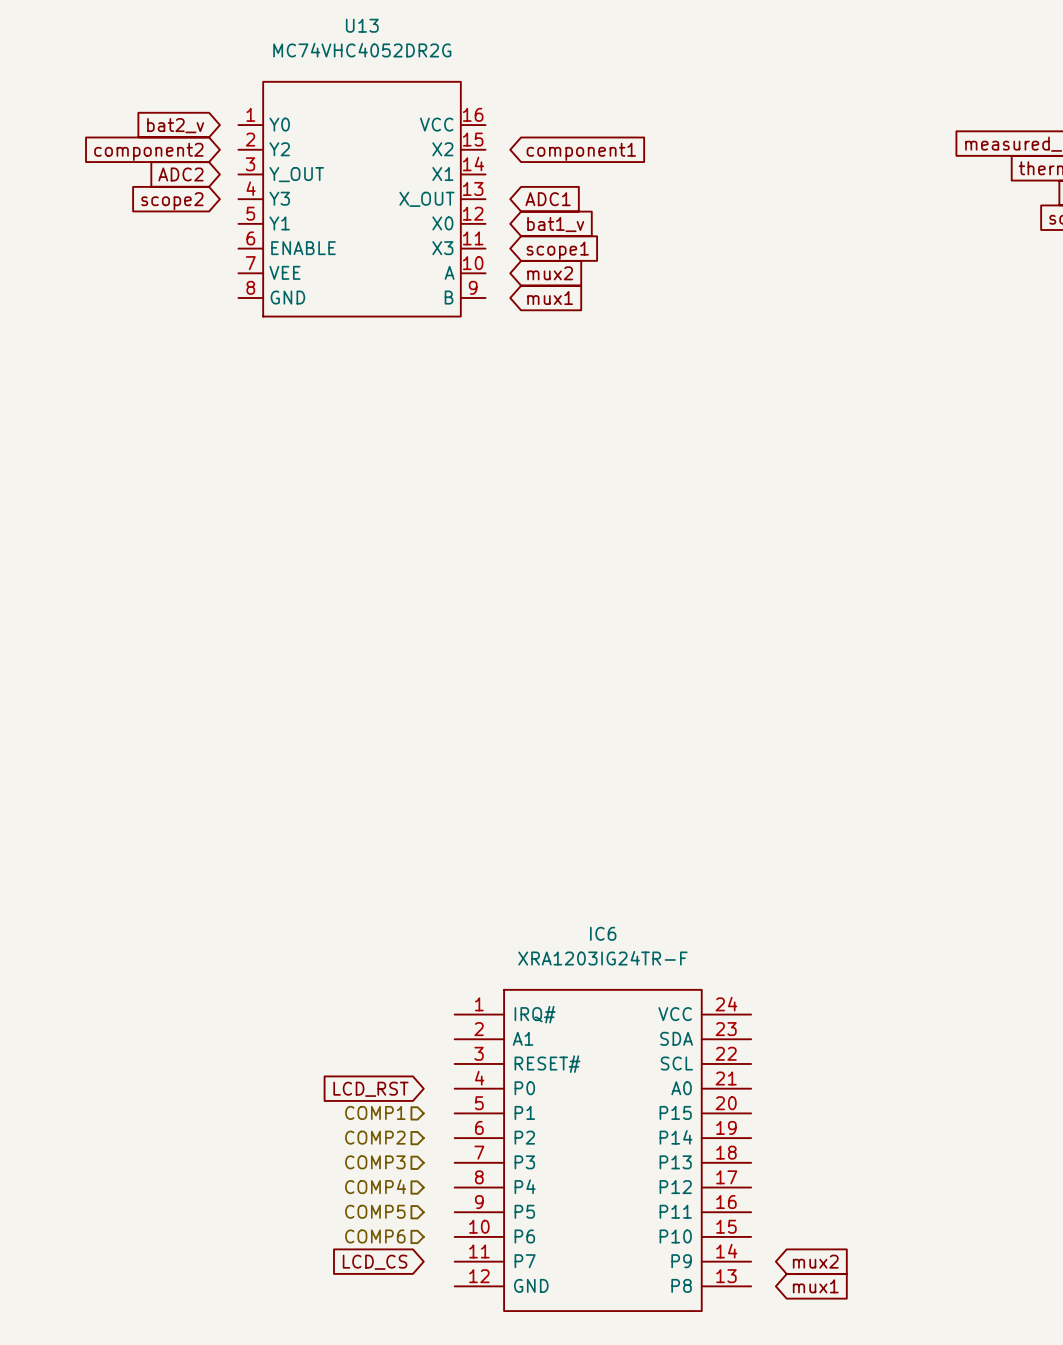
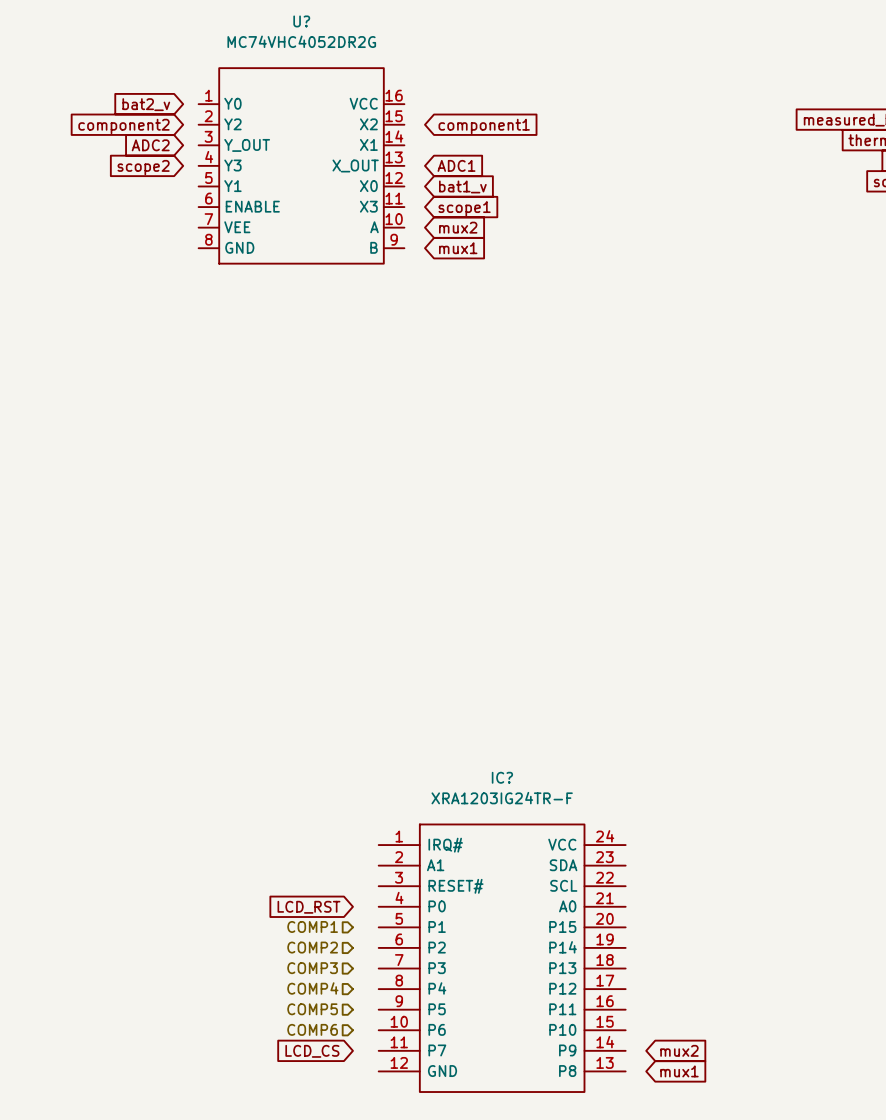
U13 name: U13 (362, 25) -> U? (301, 21)
IC6 name: IC6 (603, 933) -> IC? (502, 777)

